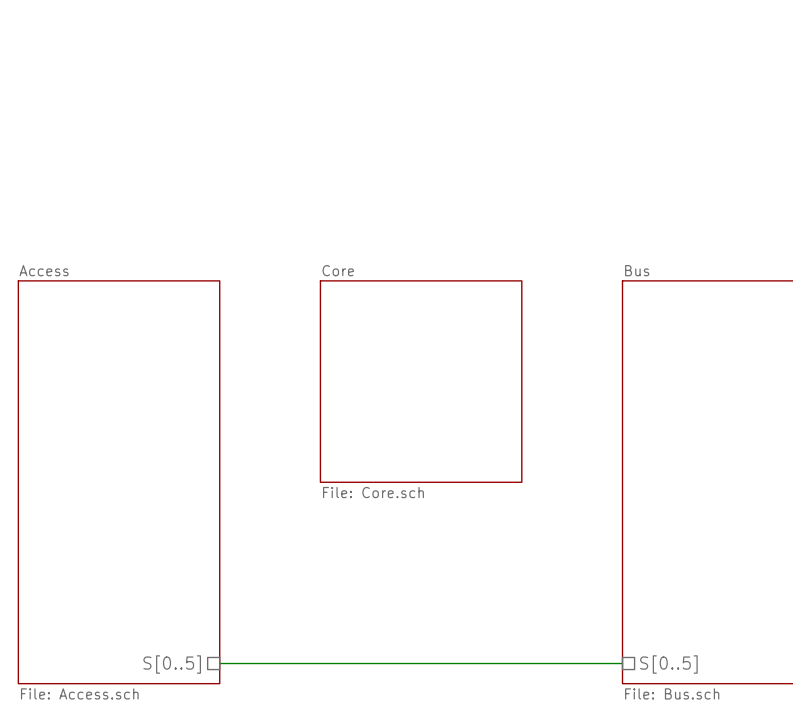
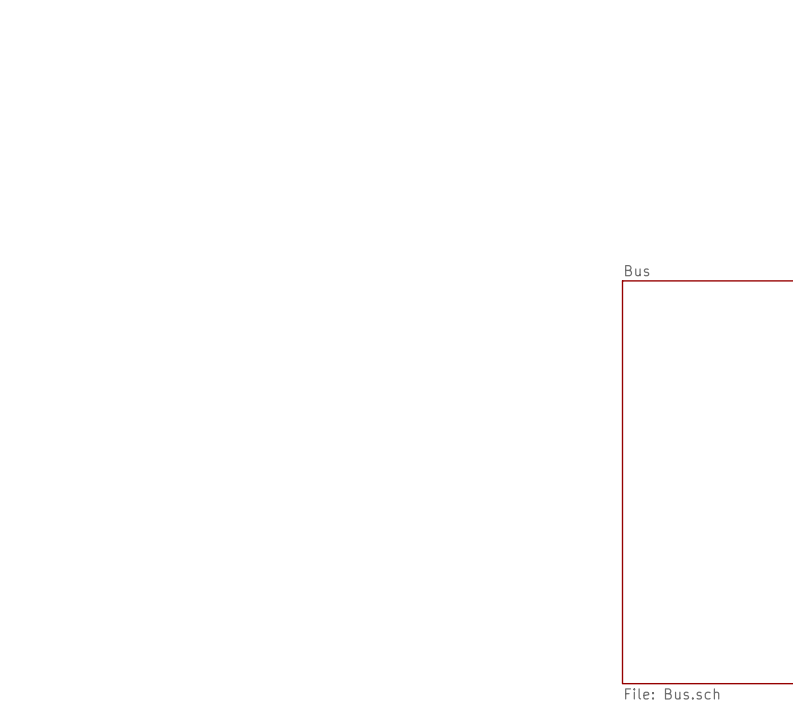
sheet Core: File: Core.sch (421, 381) -> none
sheet Access: File: Access.sch (119, 482) -> none
wire: (219, 663) (622, 663) -> none
sheet pin: S[0..5] (172, 664) -> none
sheet pin: S[0..5] (668, 664) -> none

